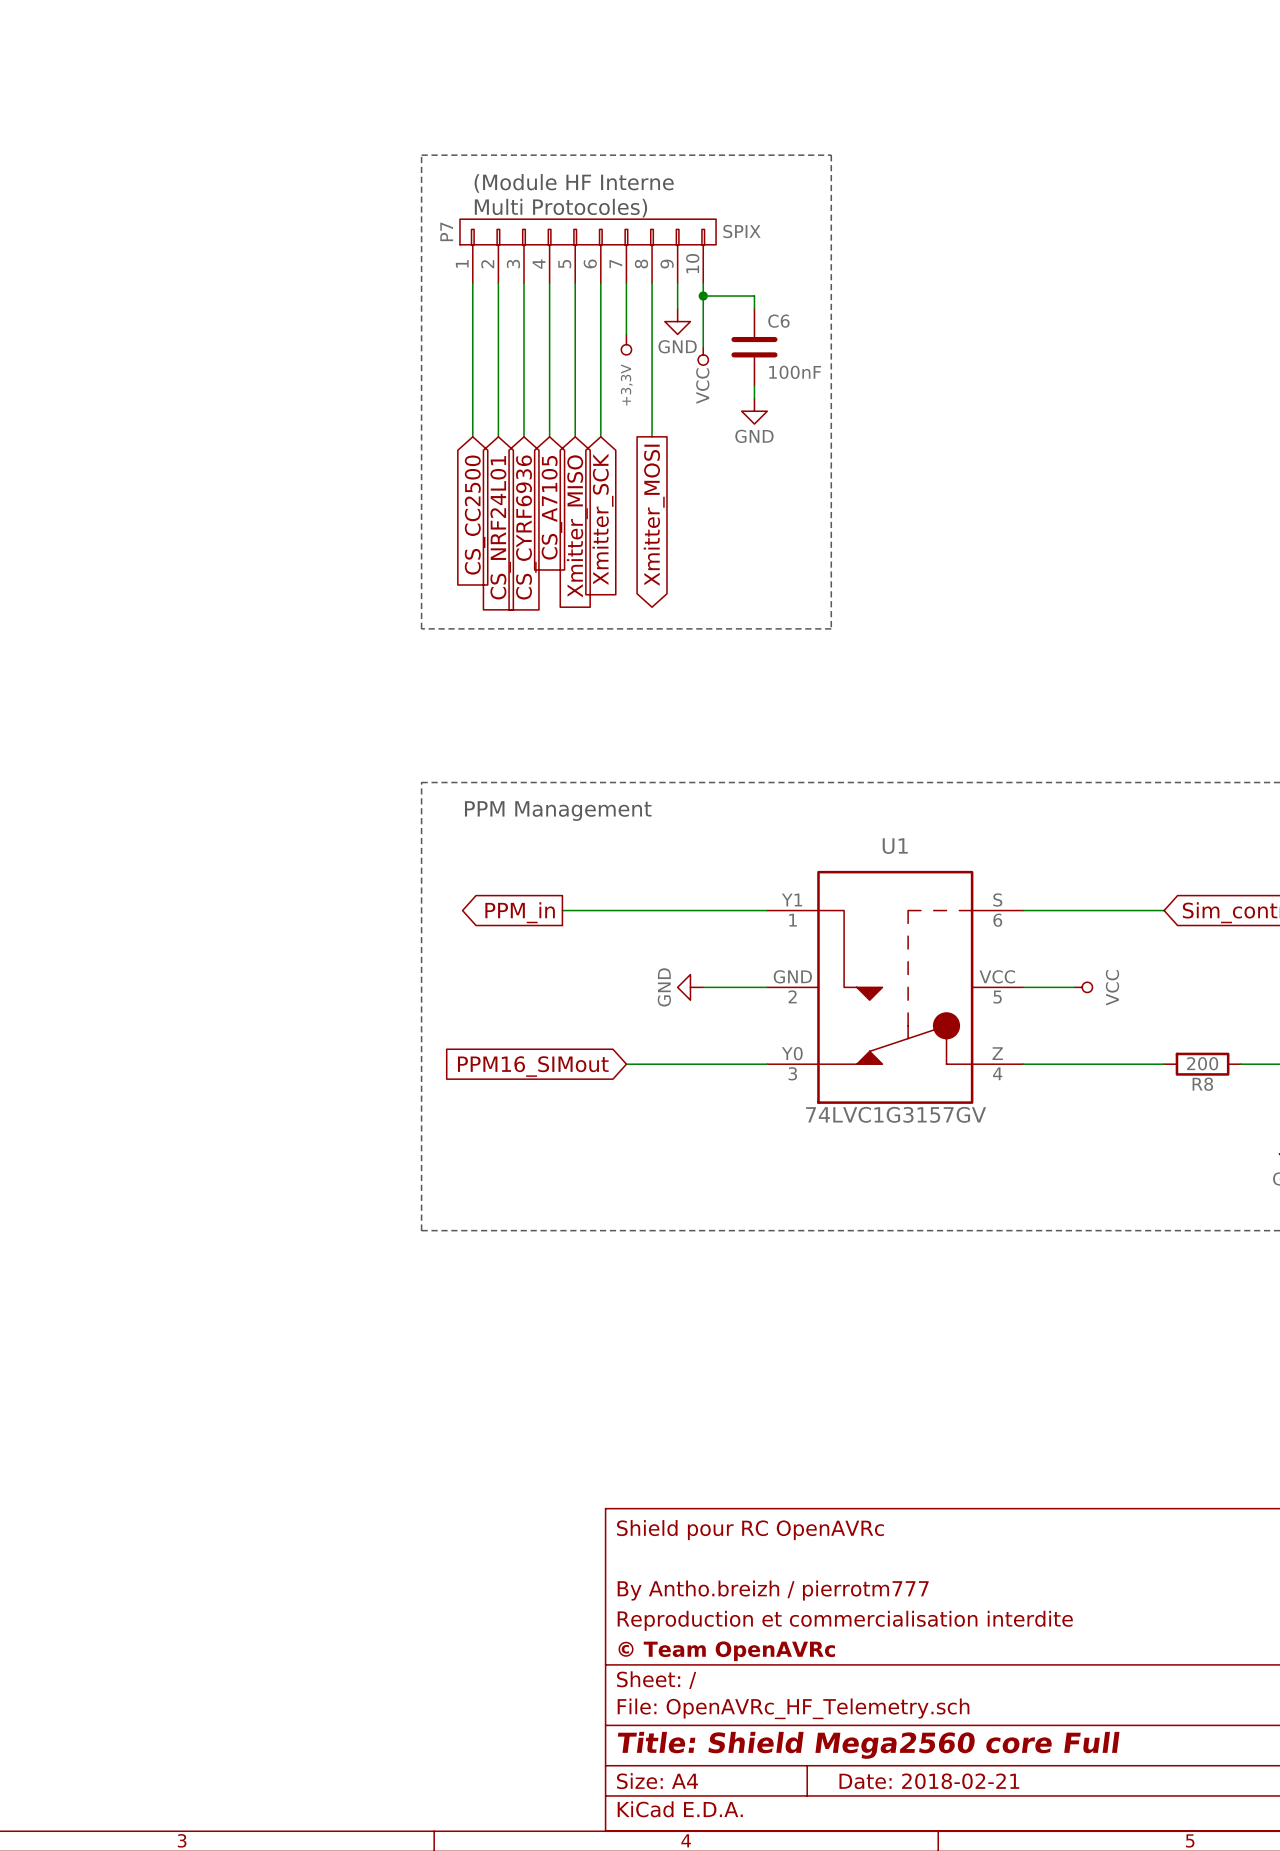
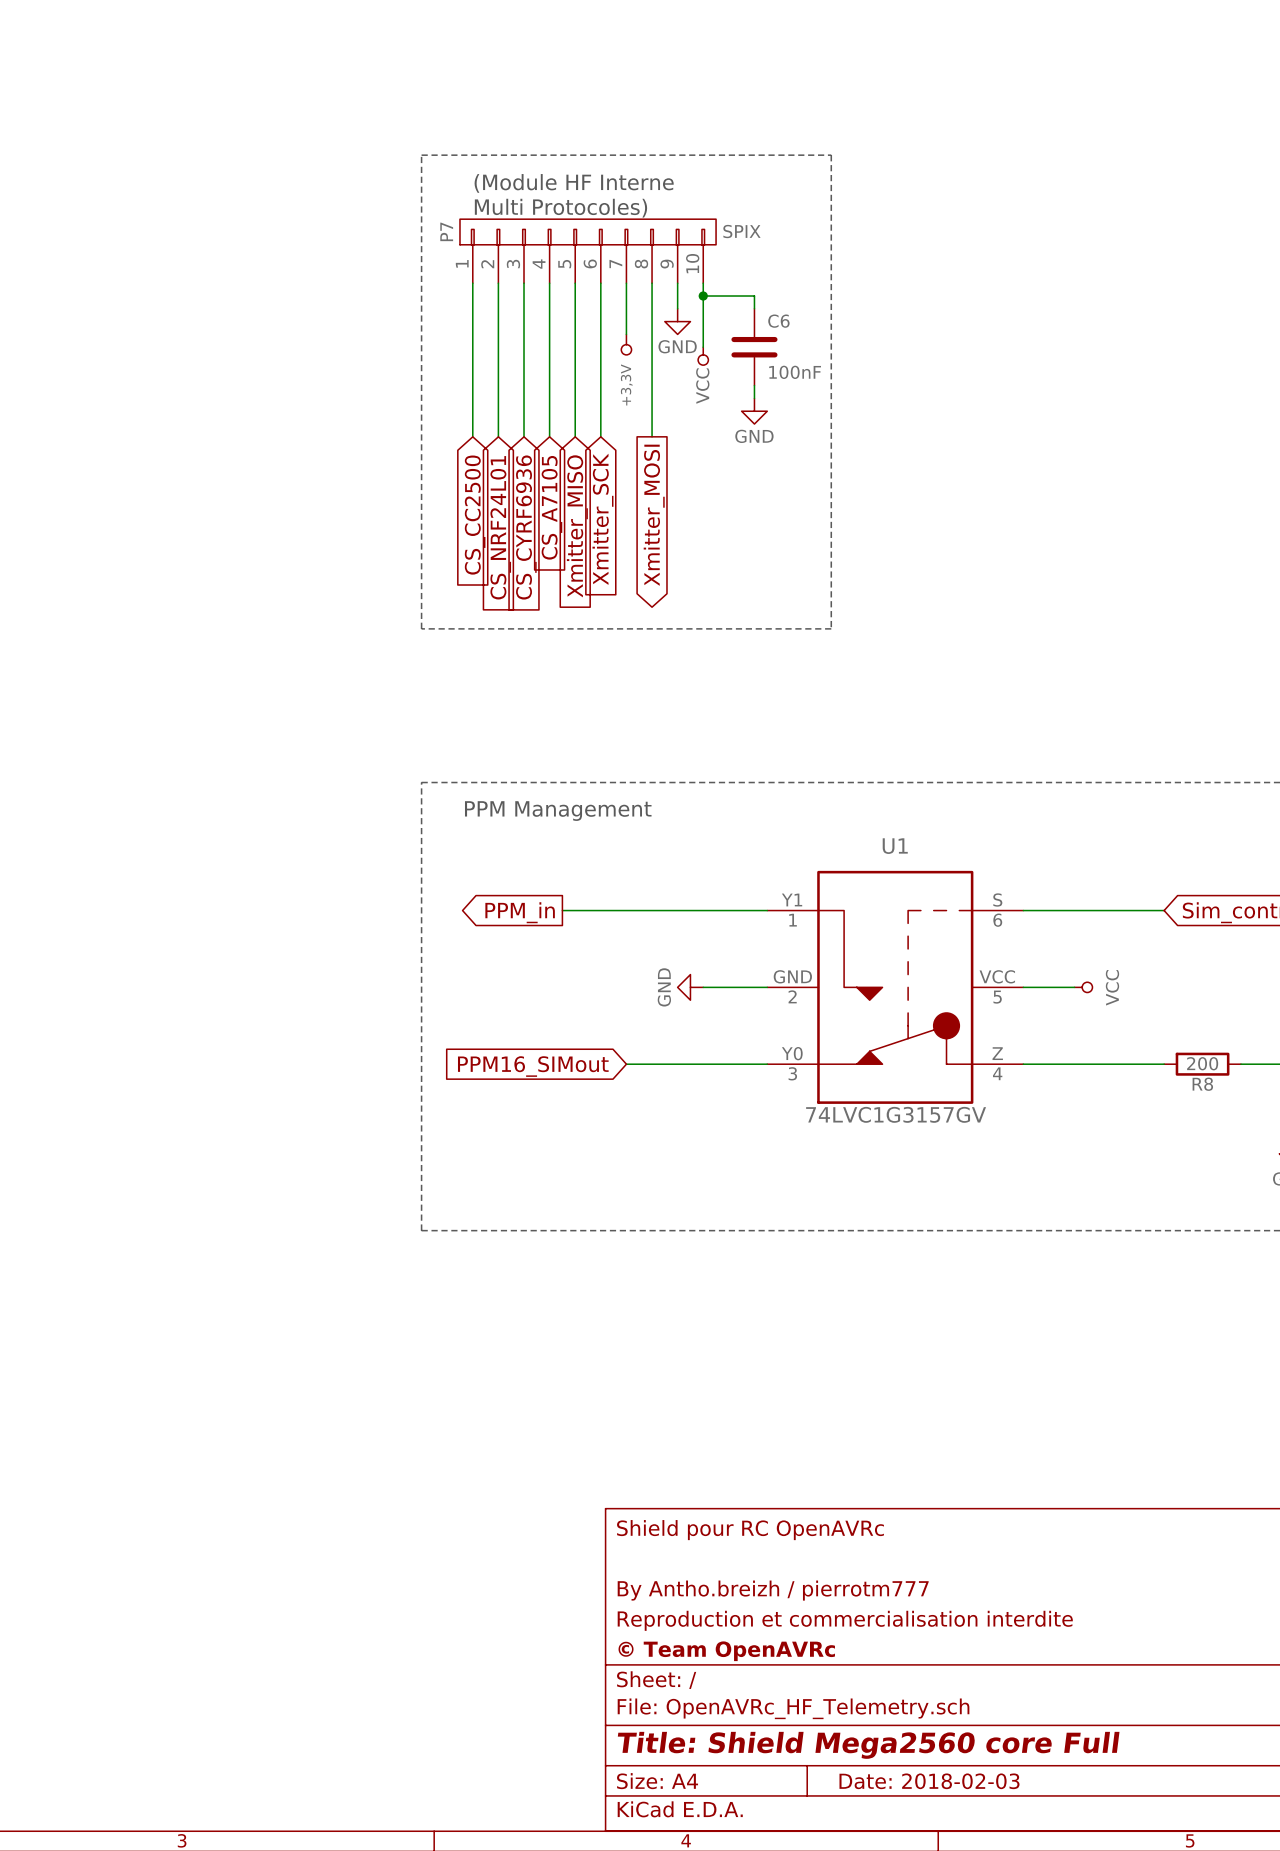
title block: Date: 2018-02-21 (929, 1781) -> Date: 2018-02-03 (929, 1781)

